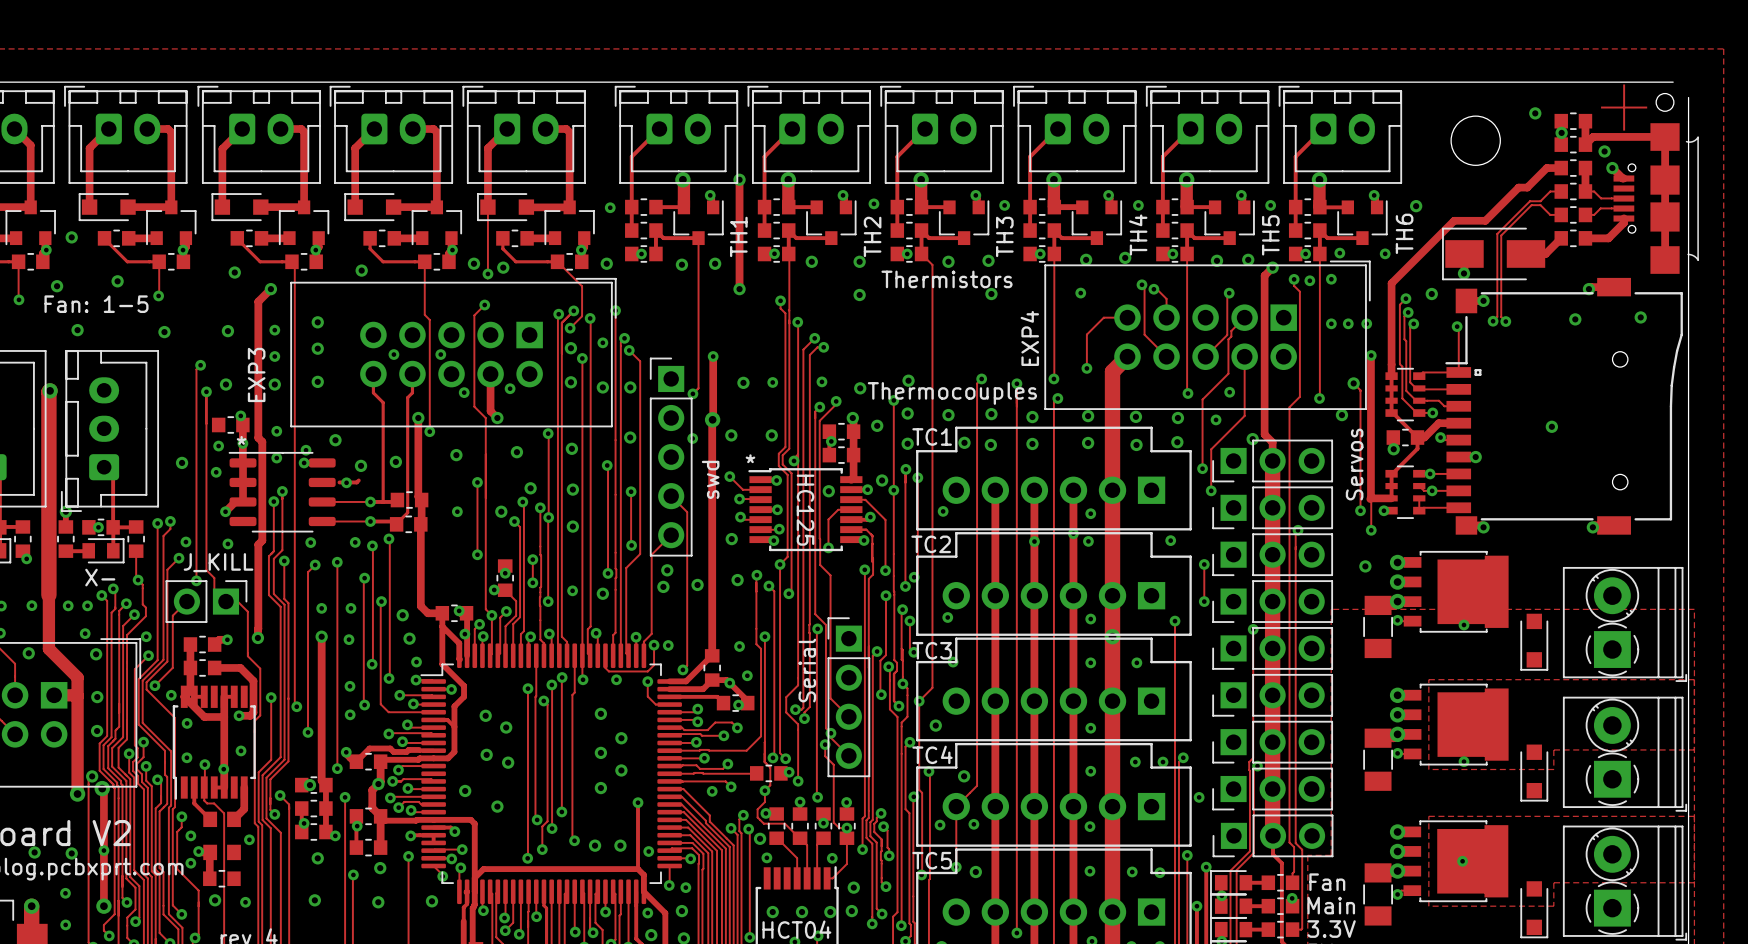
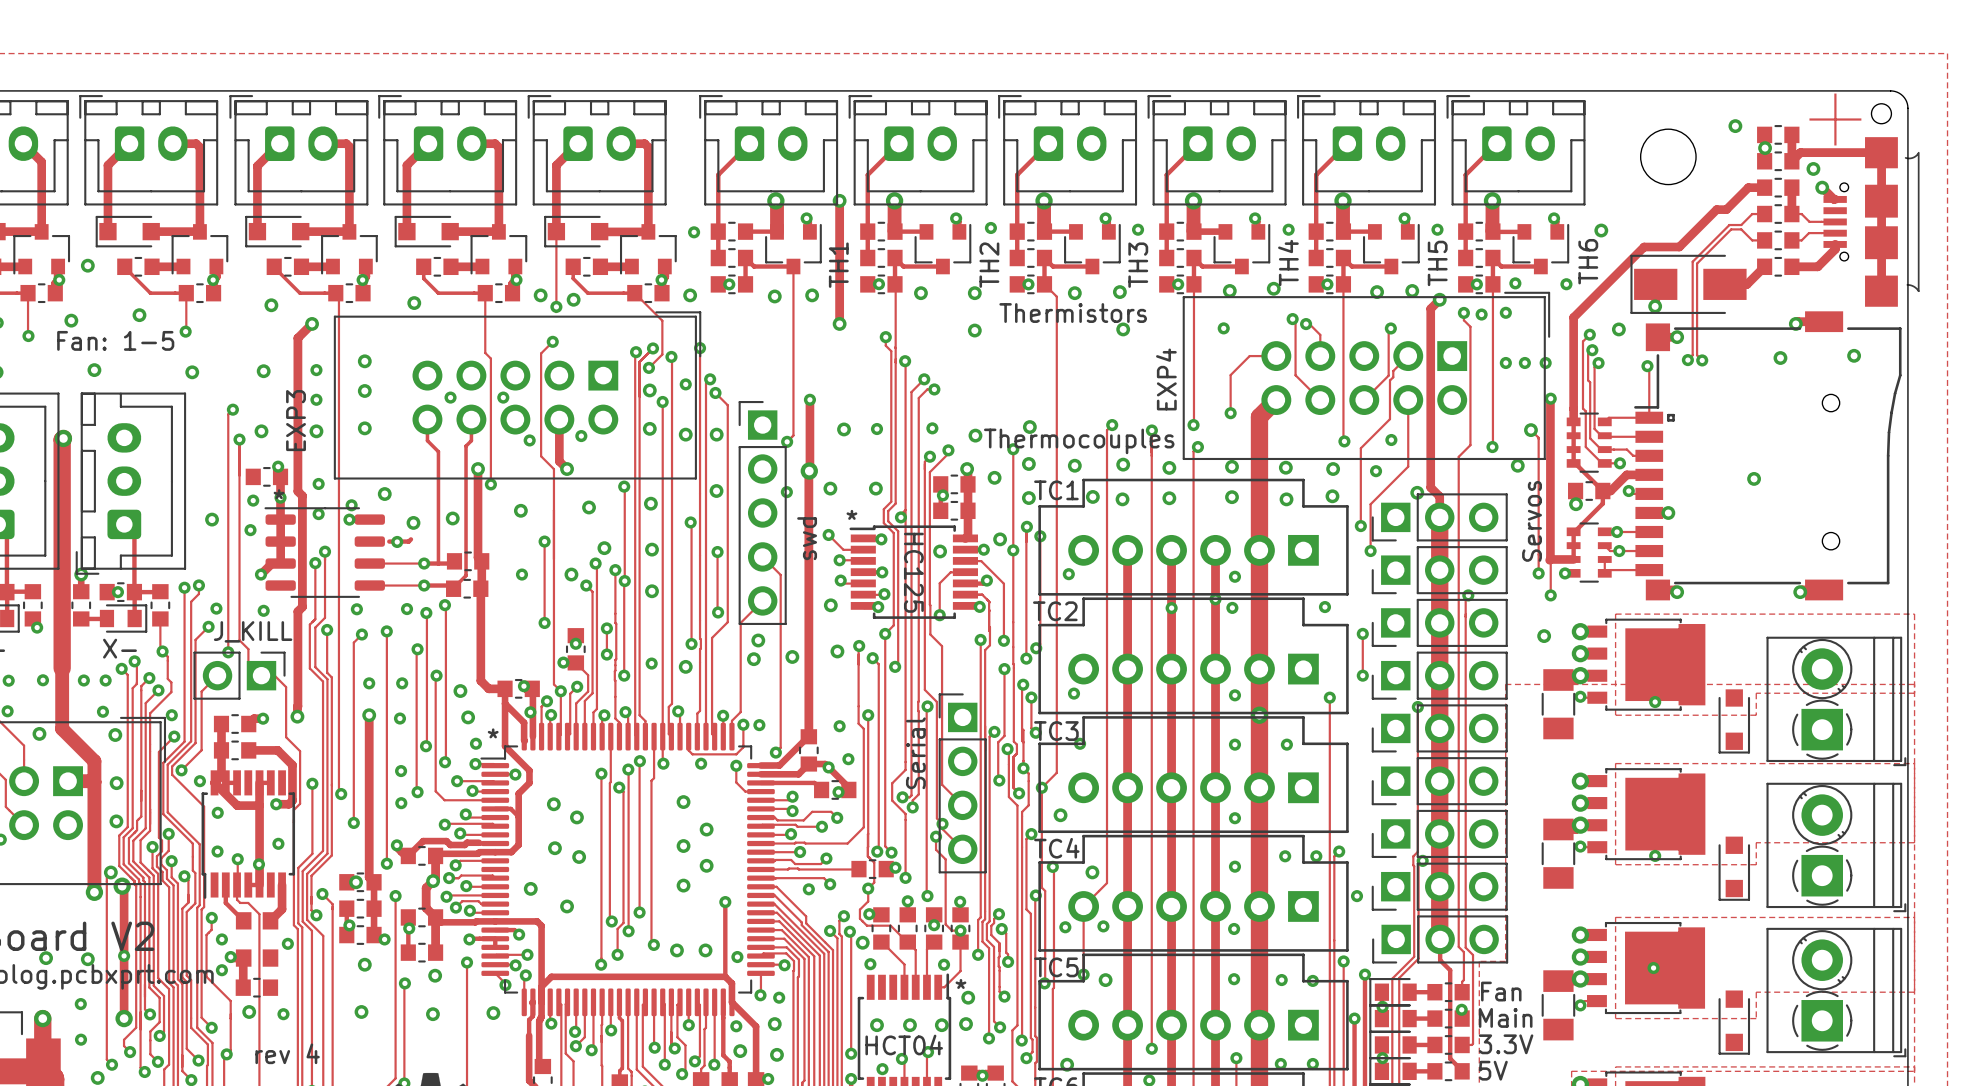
board edge: none -> (1890, 90) (1902, 95) (1907, 108)
zone outline: none -> (1914, 684) (1914, 614) (1615, 614) (1615, 715) (1756, 715) (1756, 693) (1914, 693)
text: none -> * (493, 733)
text: none -> * (960, 983)

